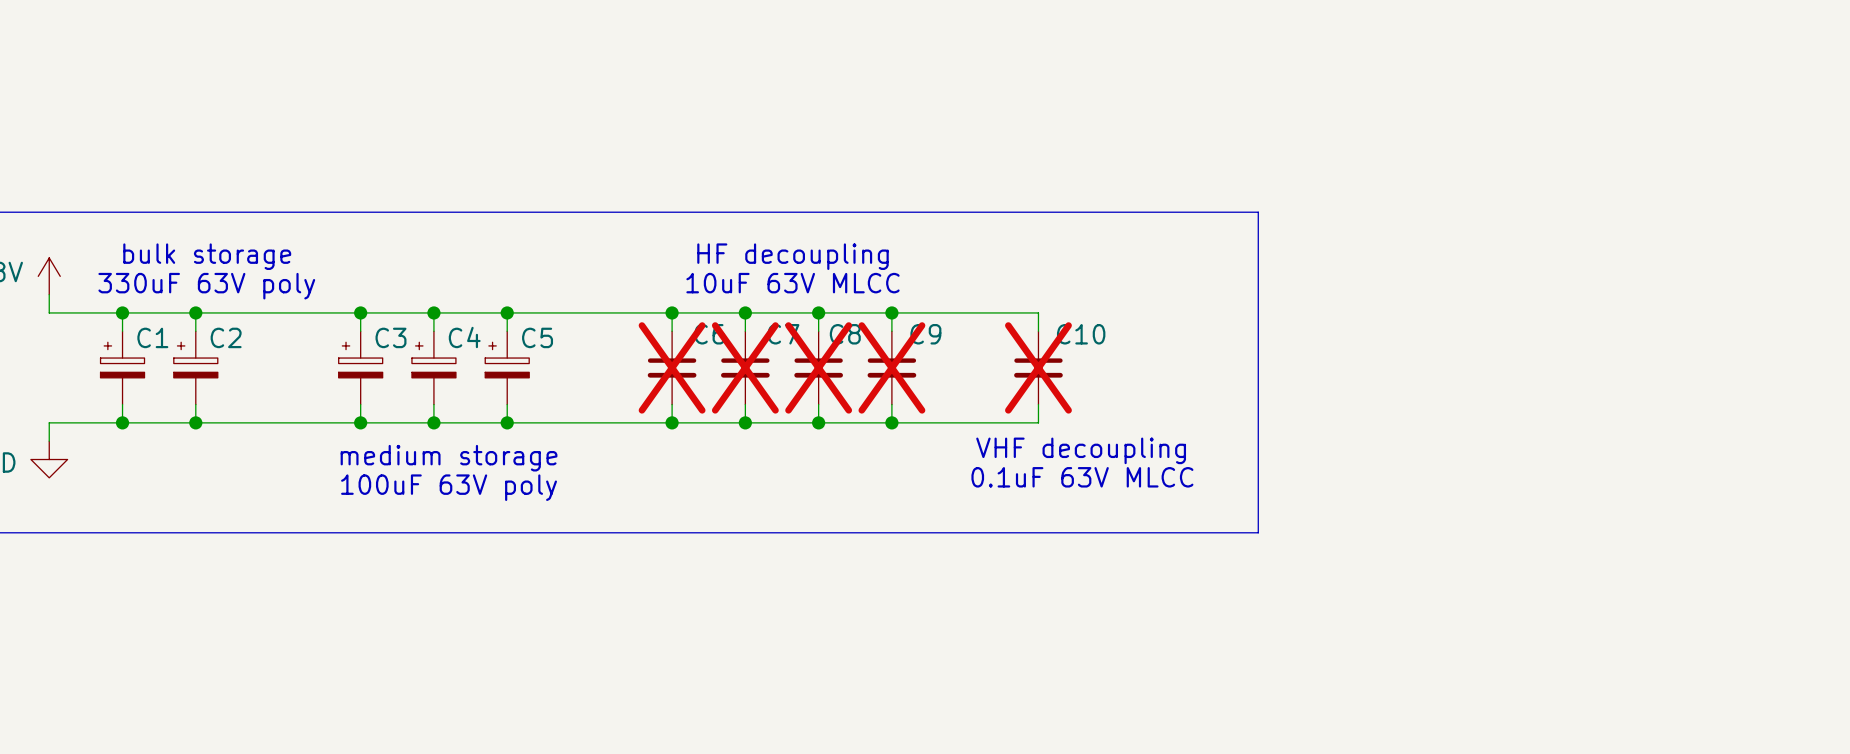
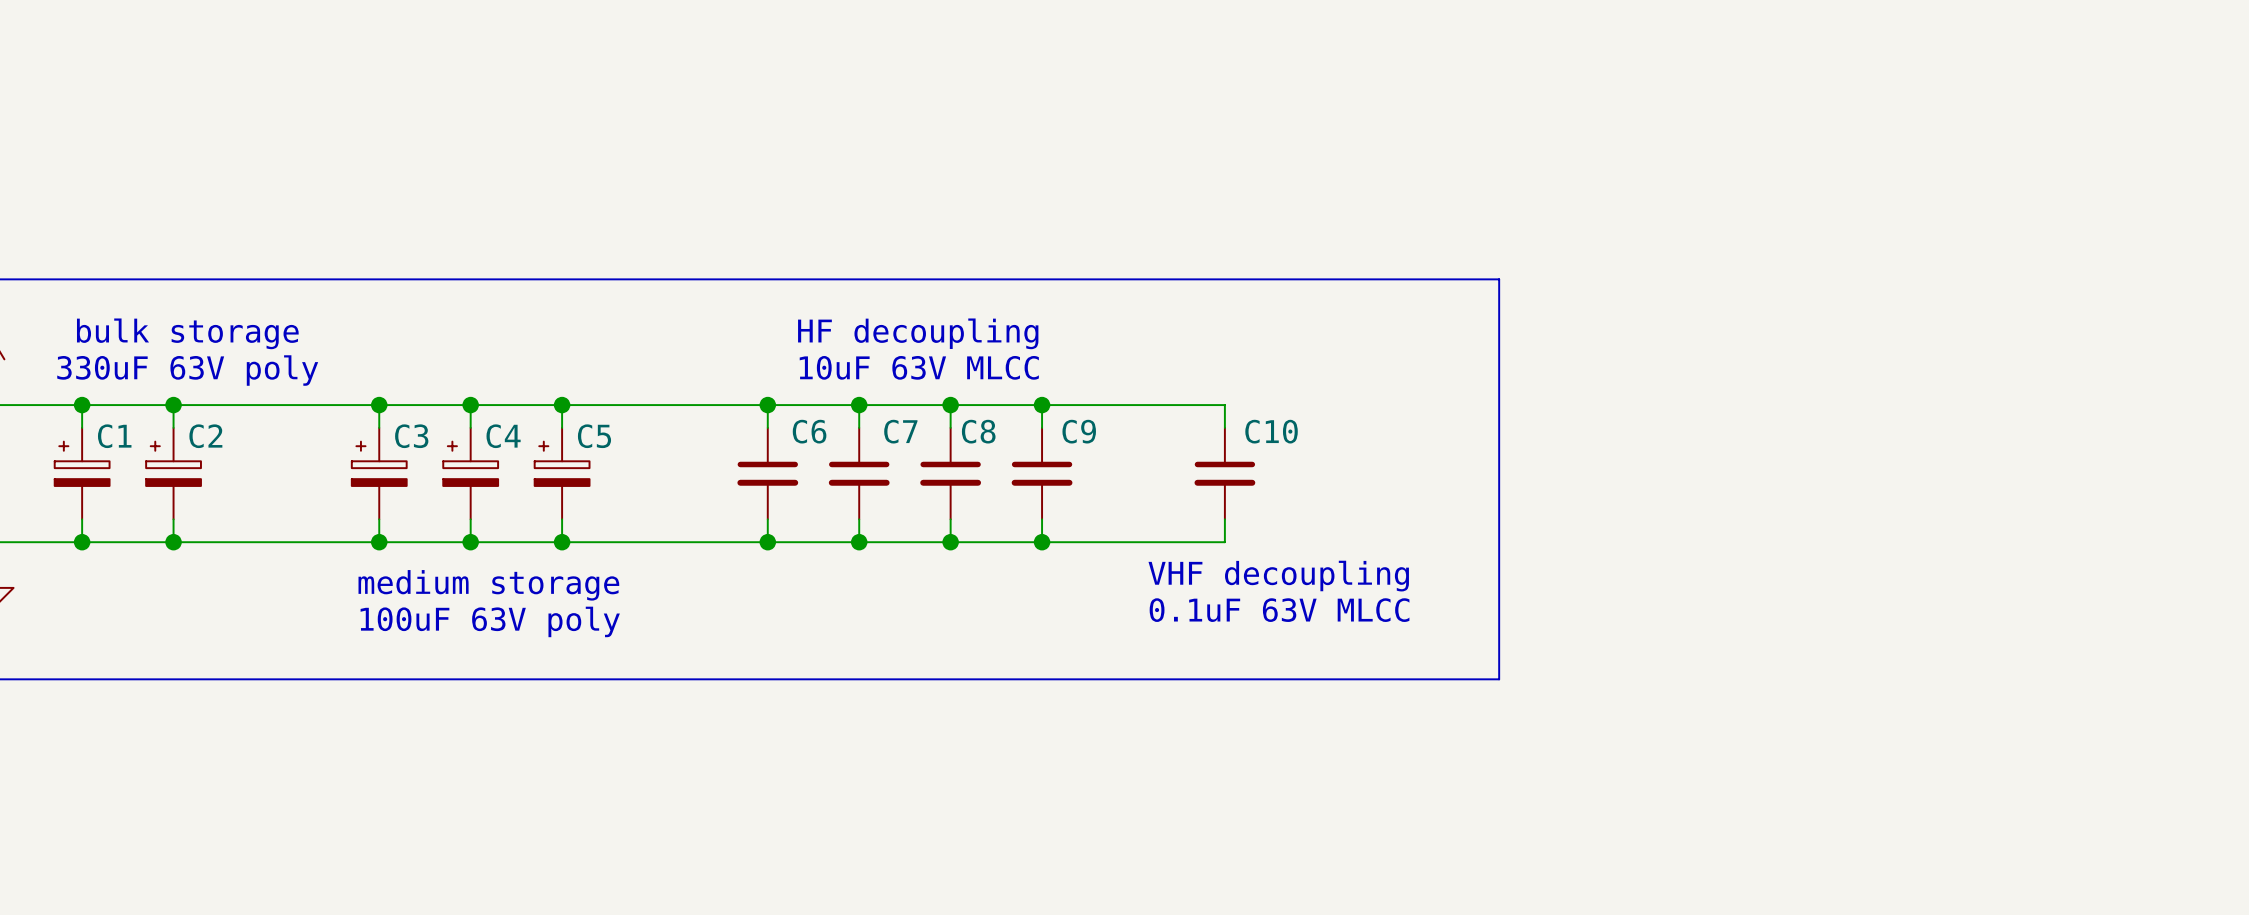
C6 do-not-place cross: (672, 367) -> none
C7 do-not-place cross: (745, 367) -> none
C8 do-not-place cross: (818, 367) -> none
C9 do-not-place cross: (891, 367) -> none
C10 do-not-place cross: (1038, 367) -> none

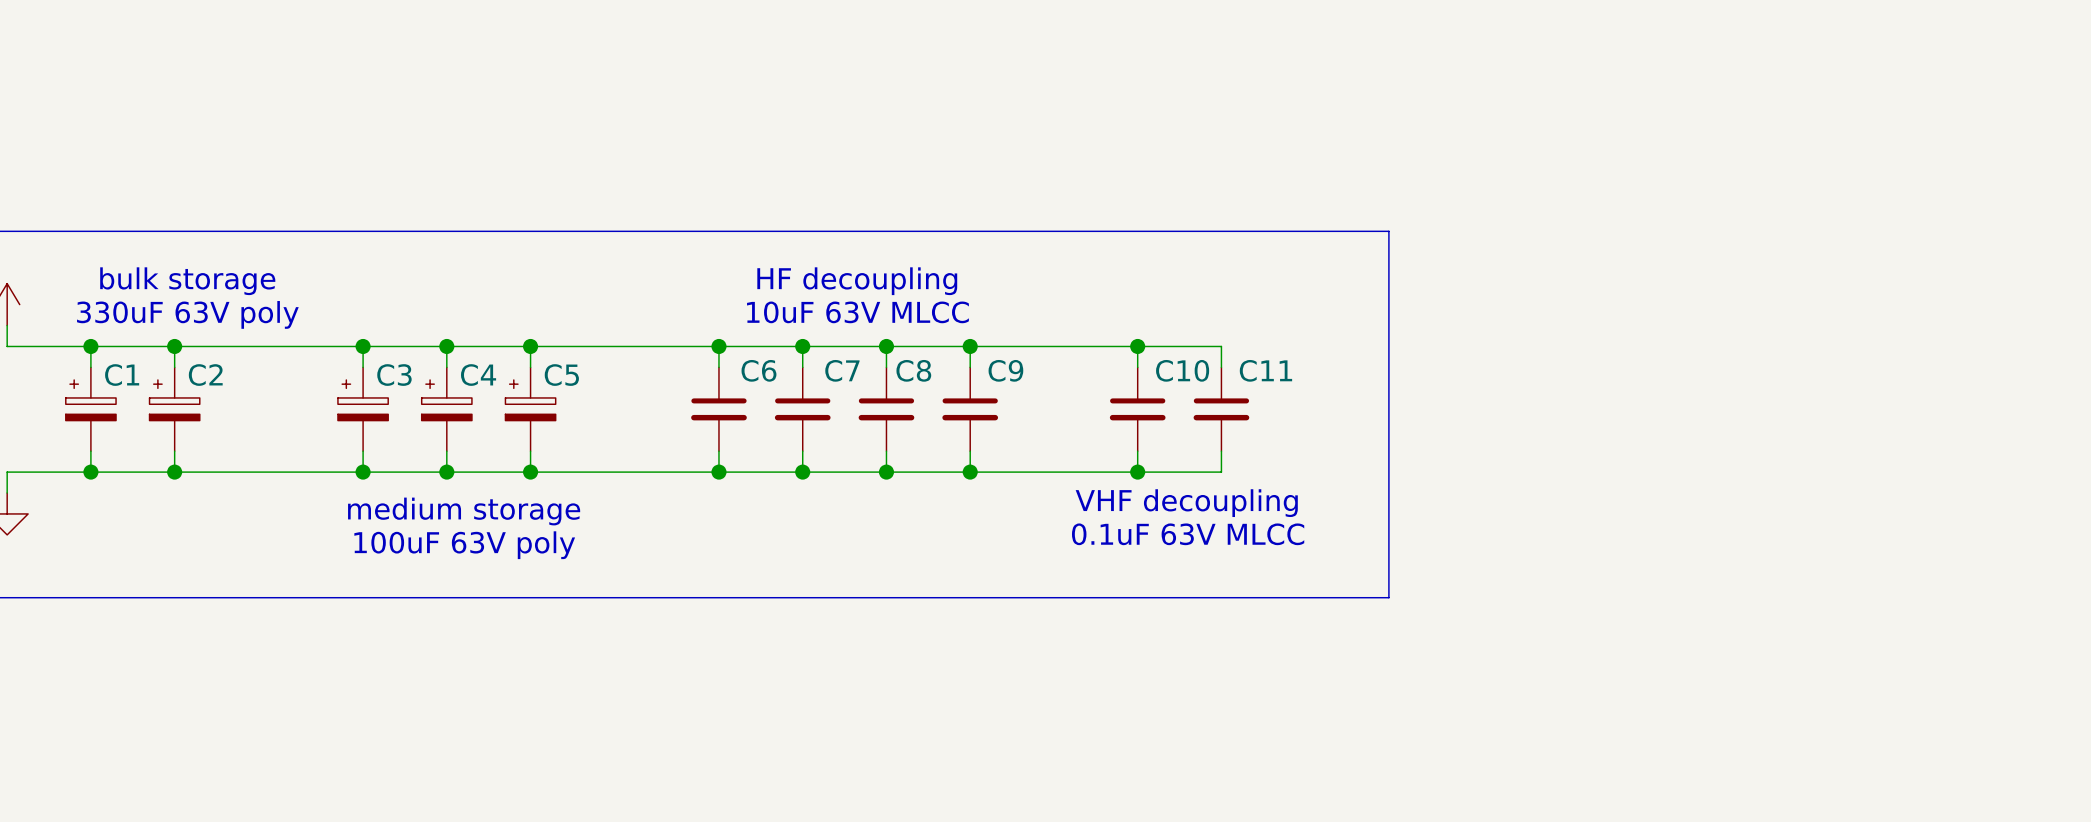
wire: none -> (1137, 346) (1221, 346) (1221, 367)
junction: none -> (1137, 346)
C11: none -> (1221, 409)
wire: none -> (1221, 451) (1221, 472) (1137, 472)
junction: none -> (1137, 472)

